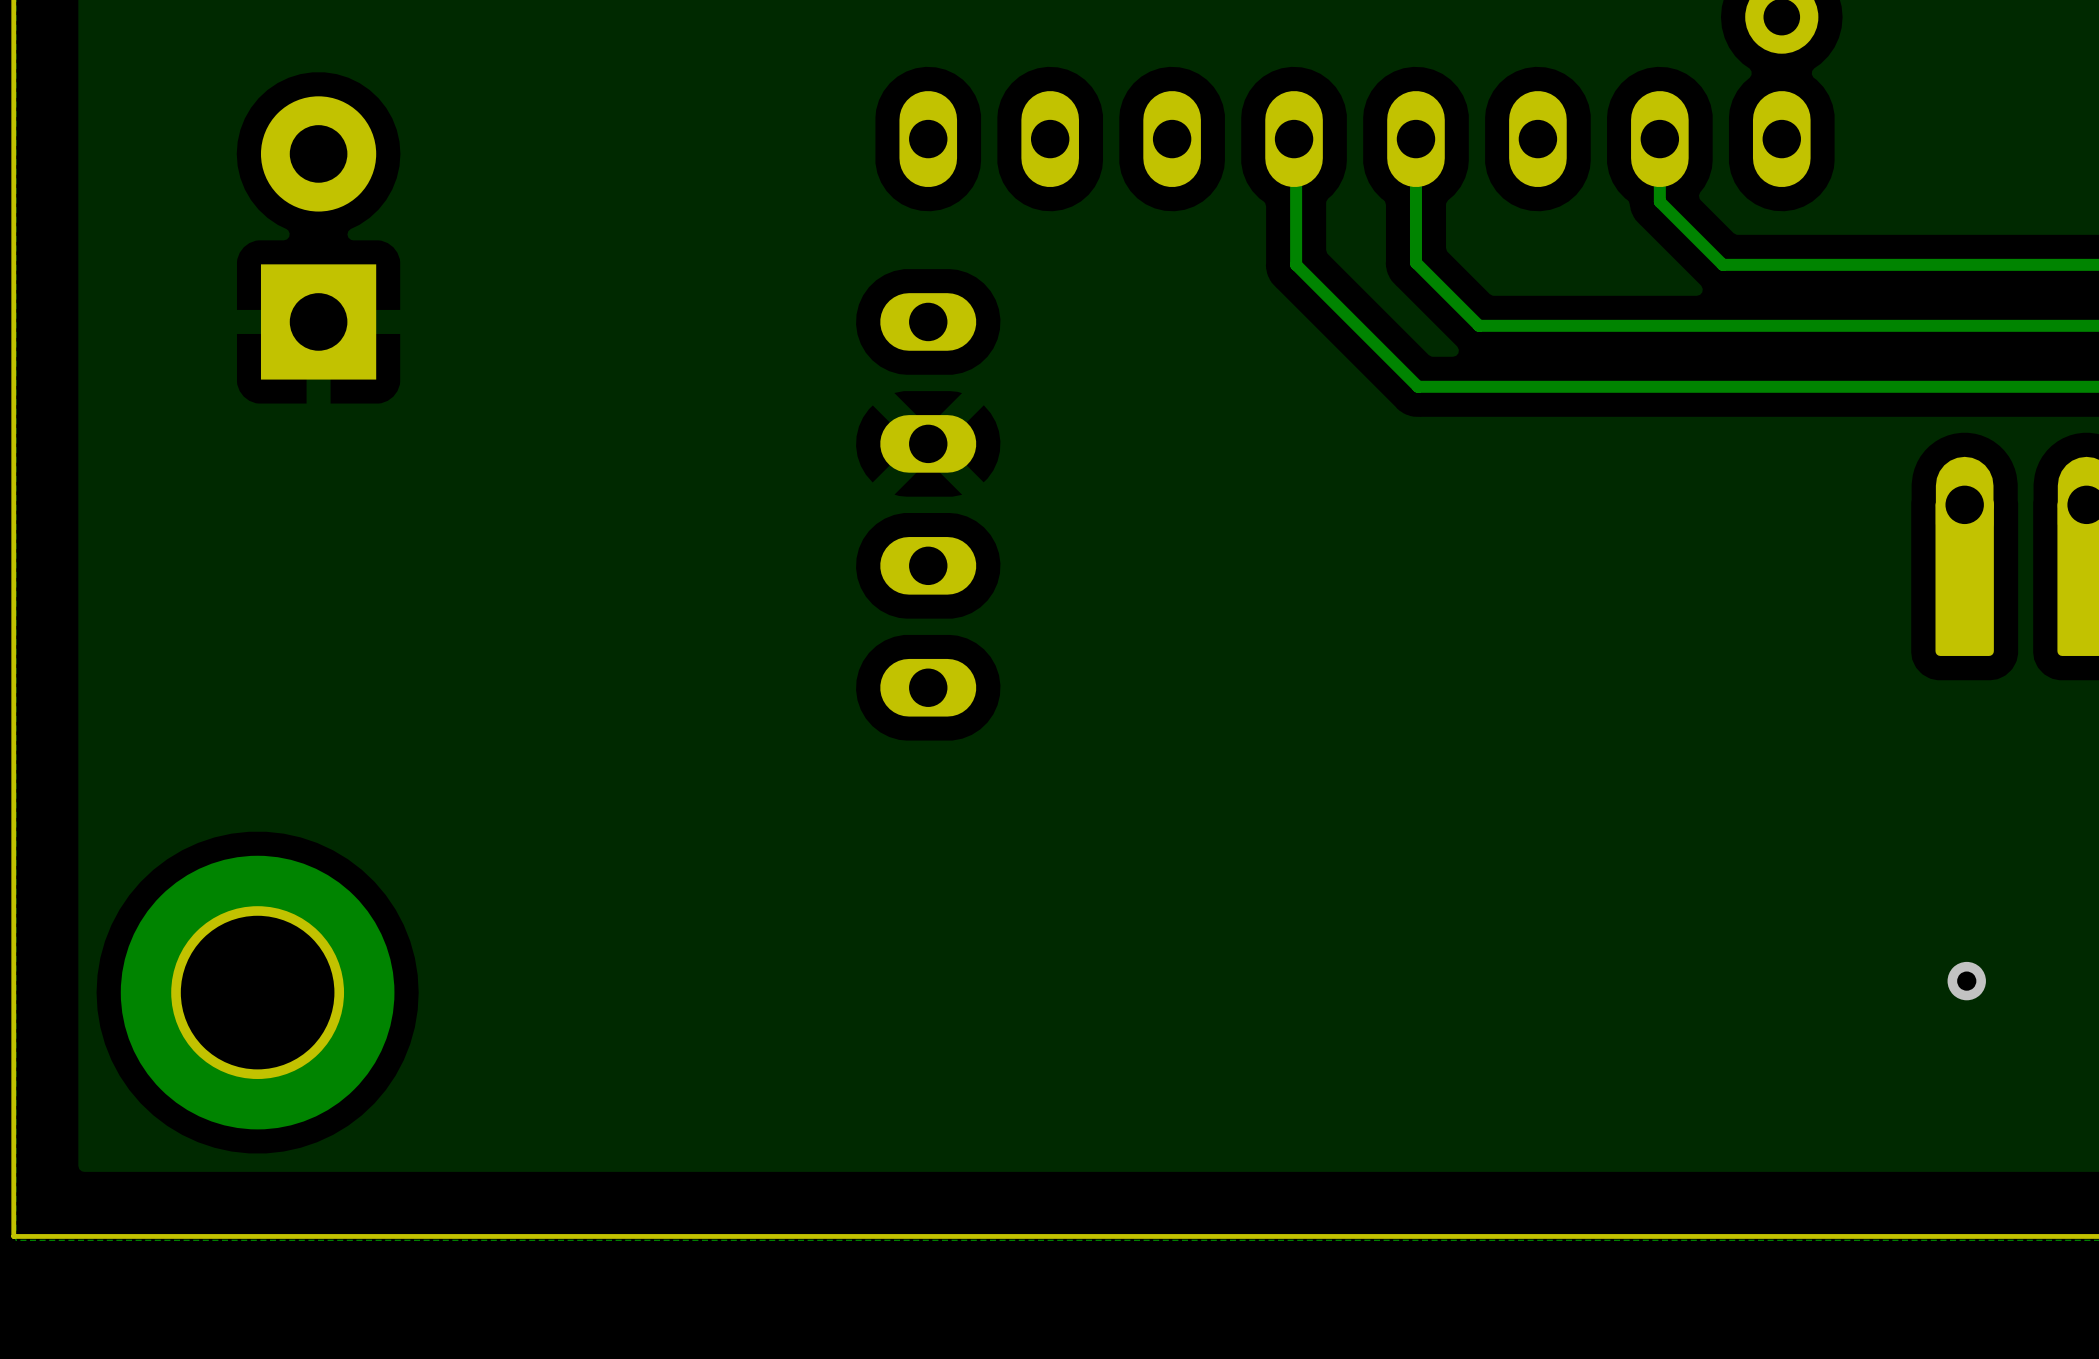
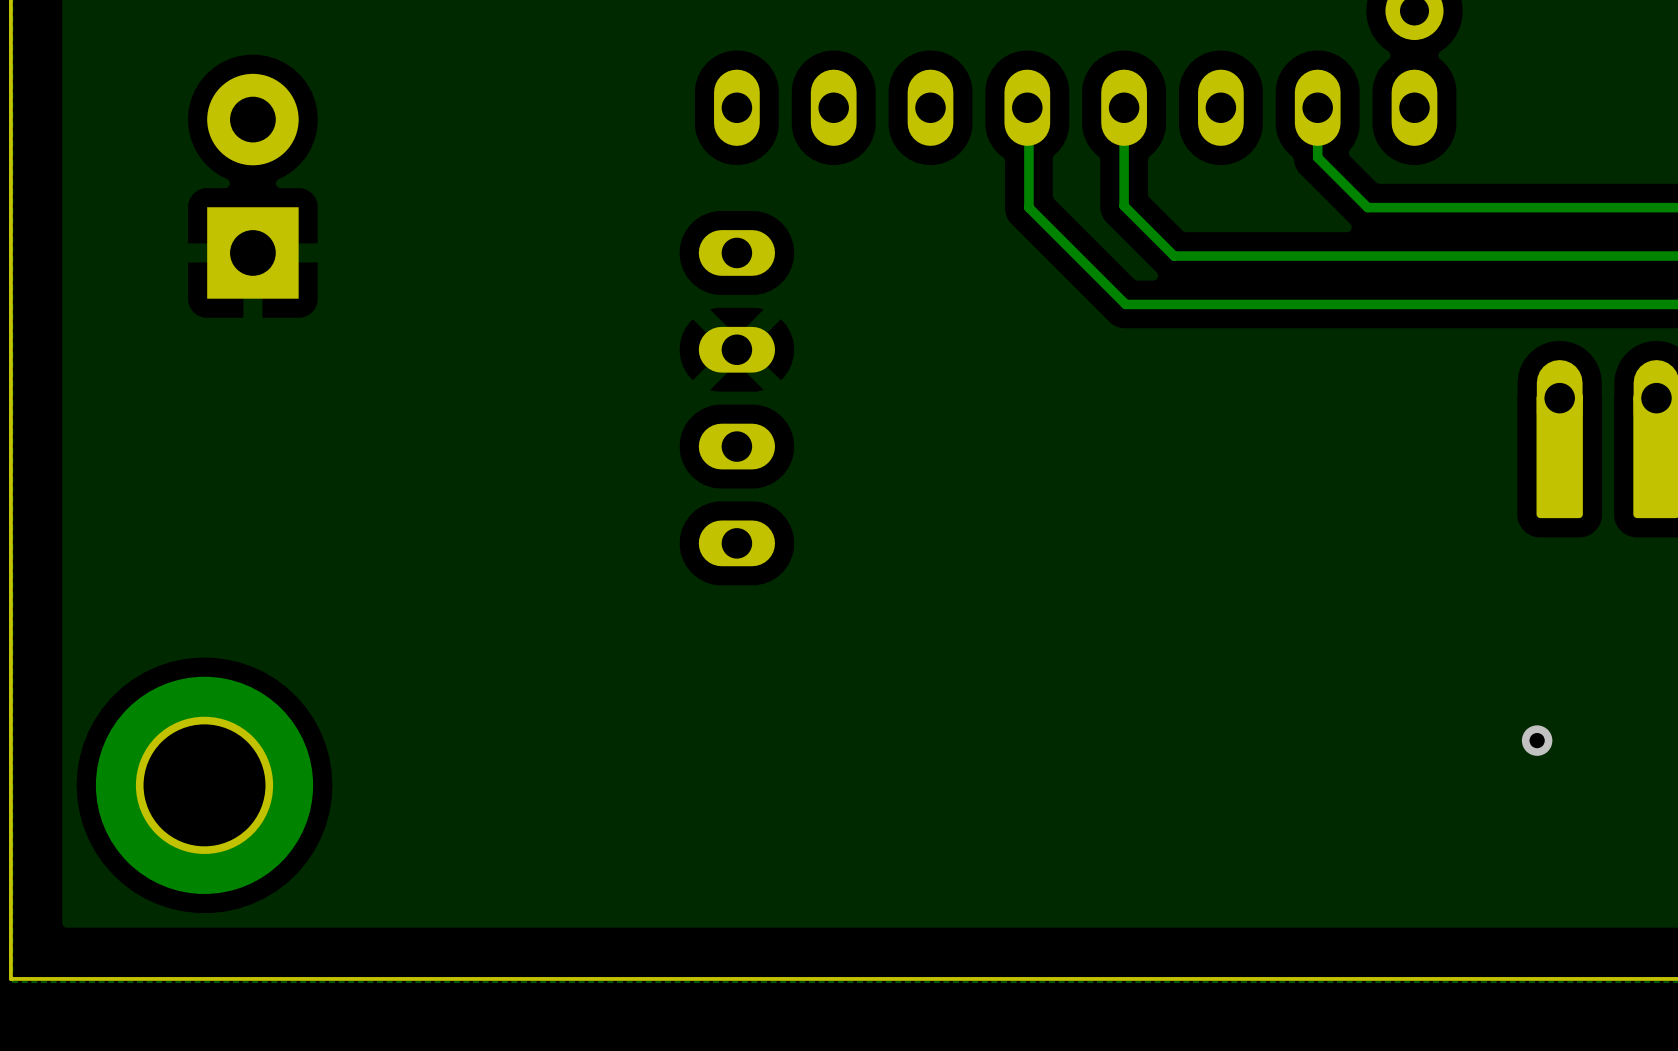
via position: (1966, 981) -> (1537, 740)

